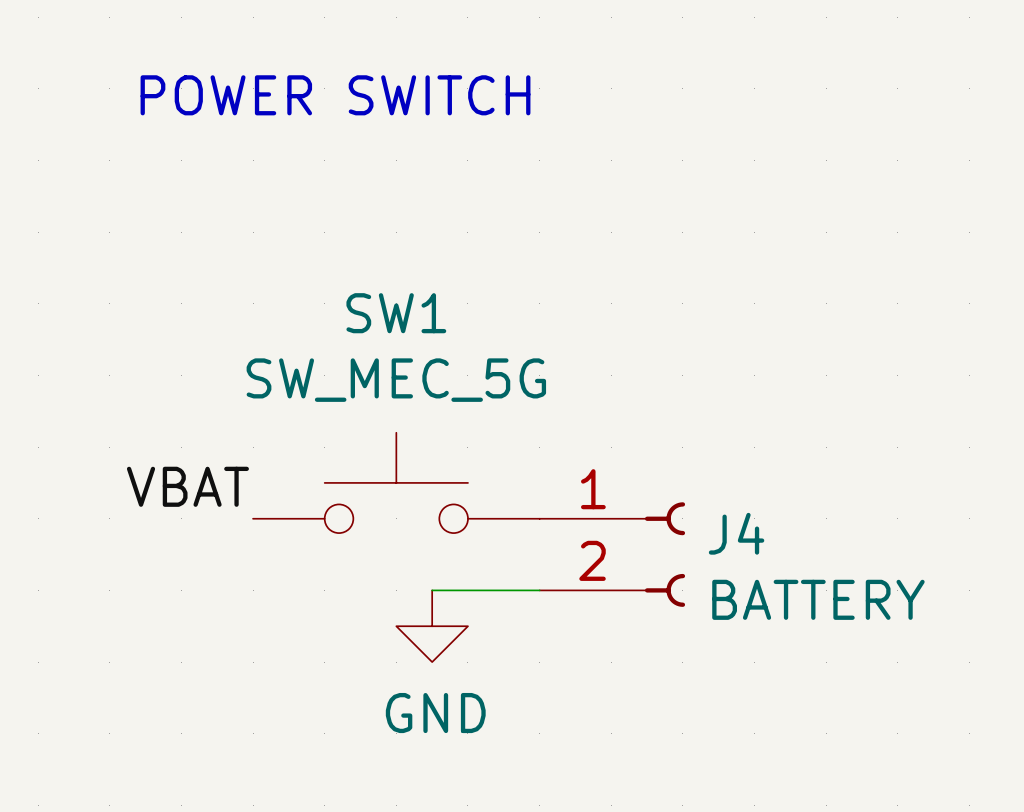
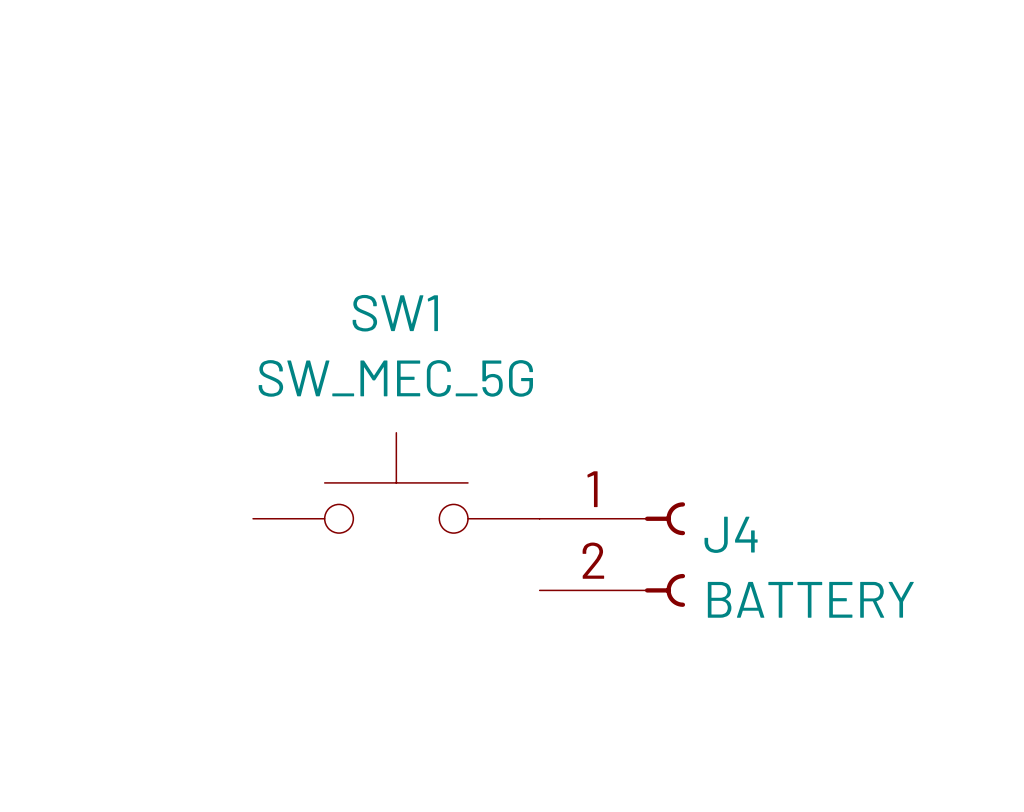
text: POWER SWITCH (335, 95) -> none
label: VBAT (187, 486) -> none
wire: (432, 590) (539, 590) -> none
power symbol: GND (432, 626) -> none

